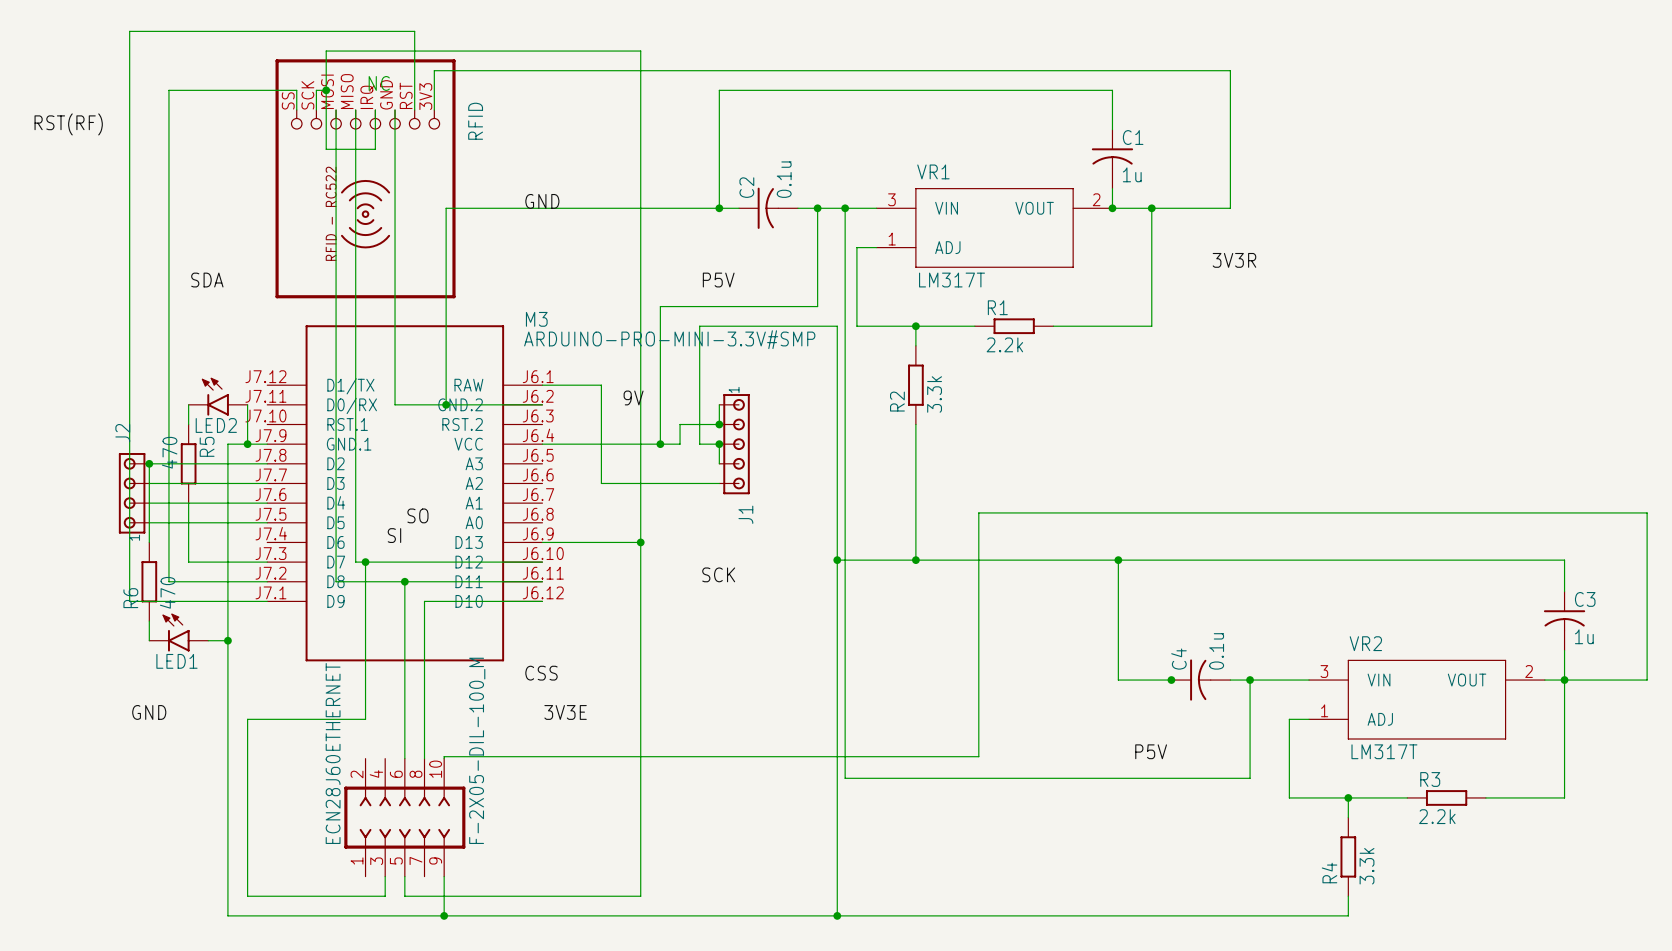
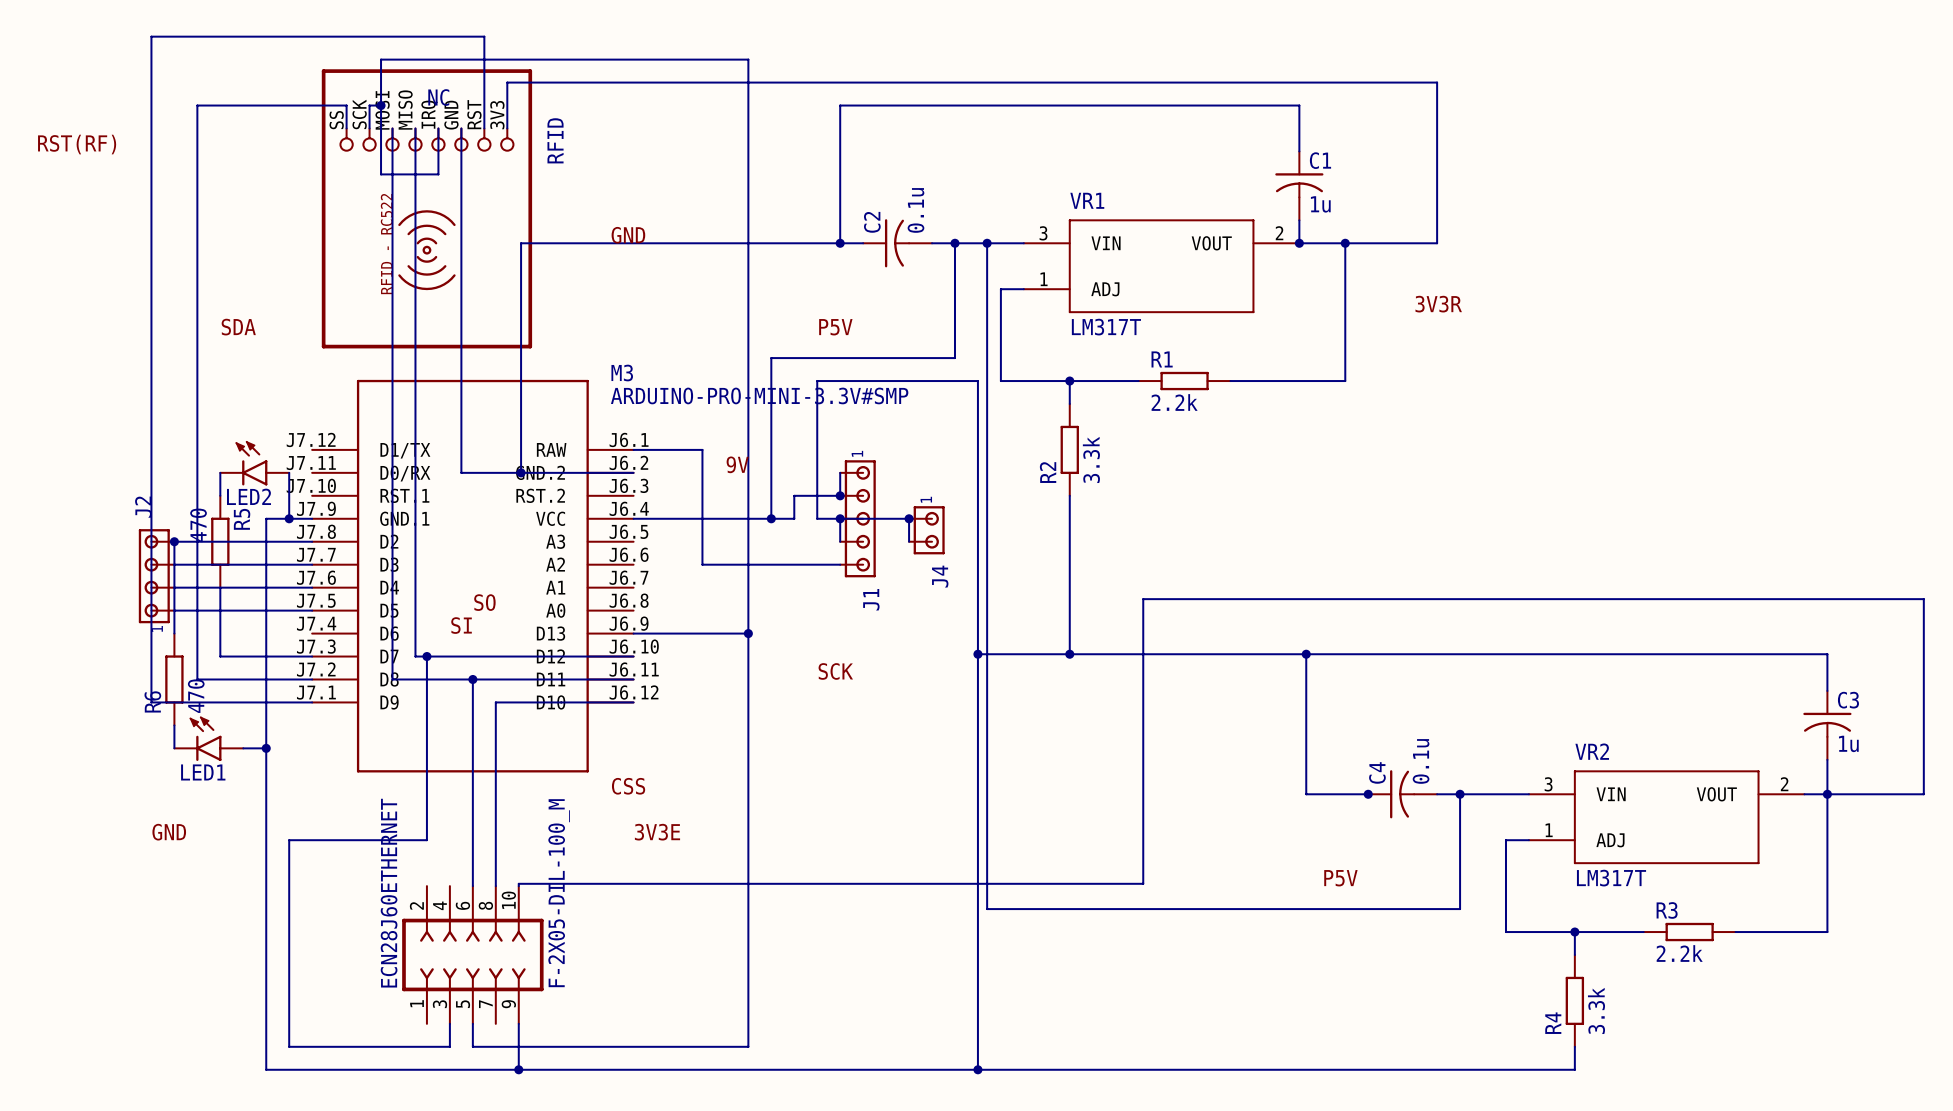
wire: none -> (840, 518) (909, 518) (909, 541)
junction: none -> (909, 518)
J4: none -> (926, 530)

